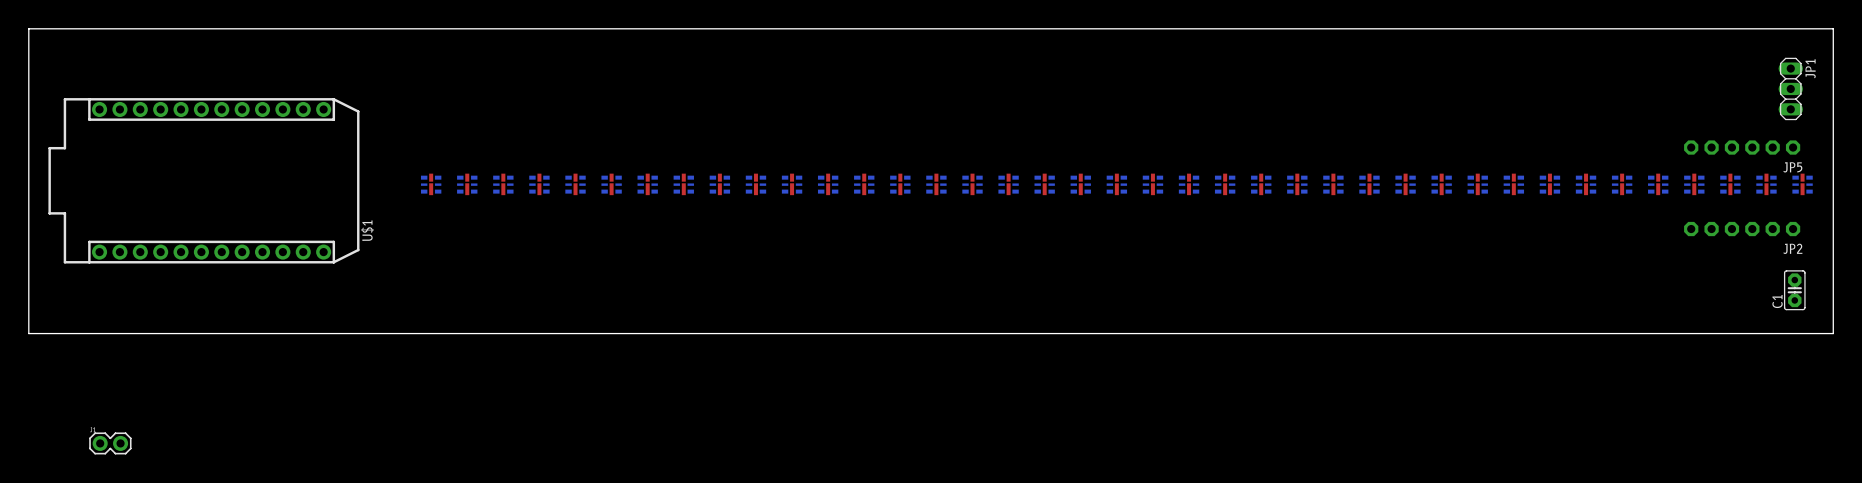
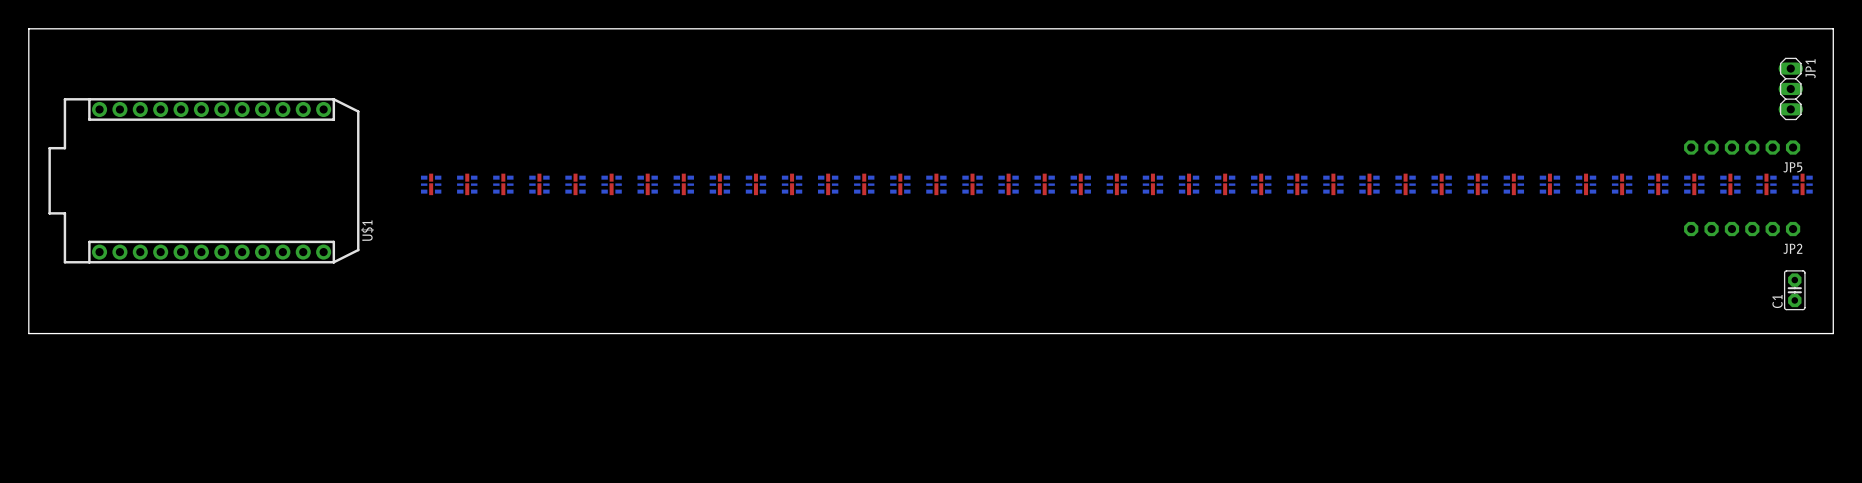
part: (110, 443) -> none

